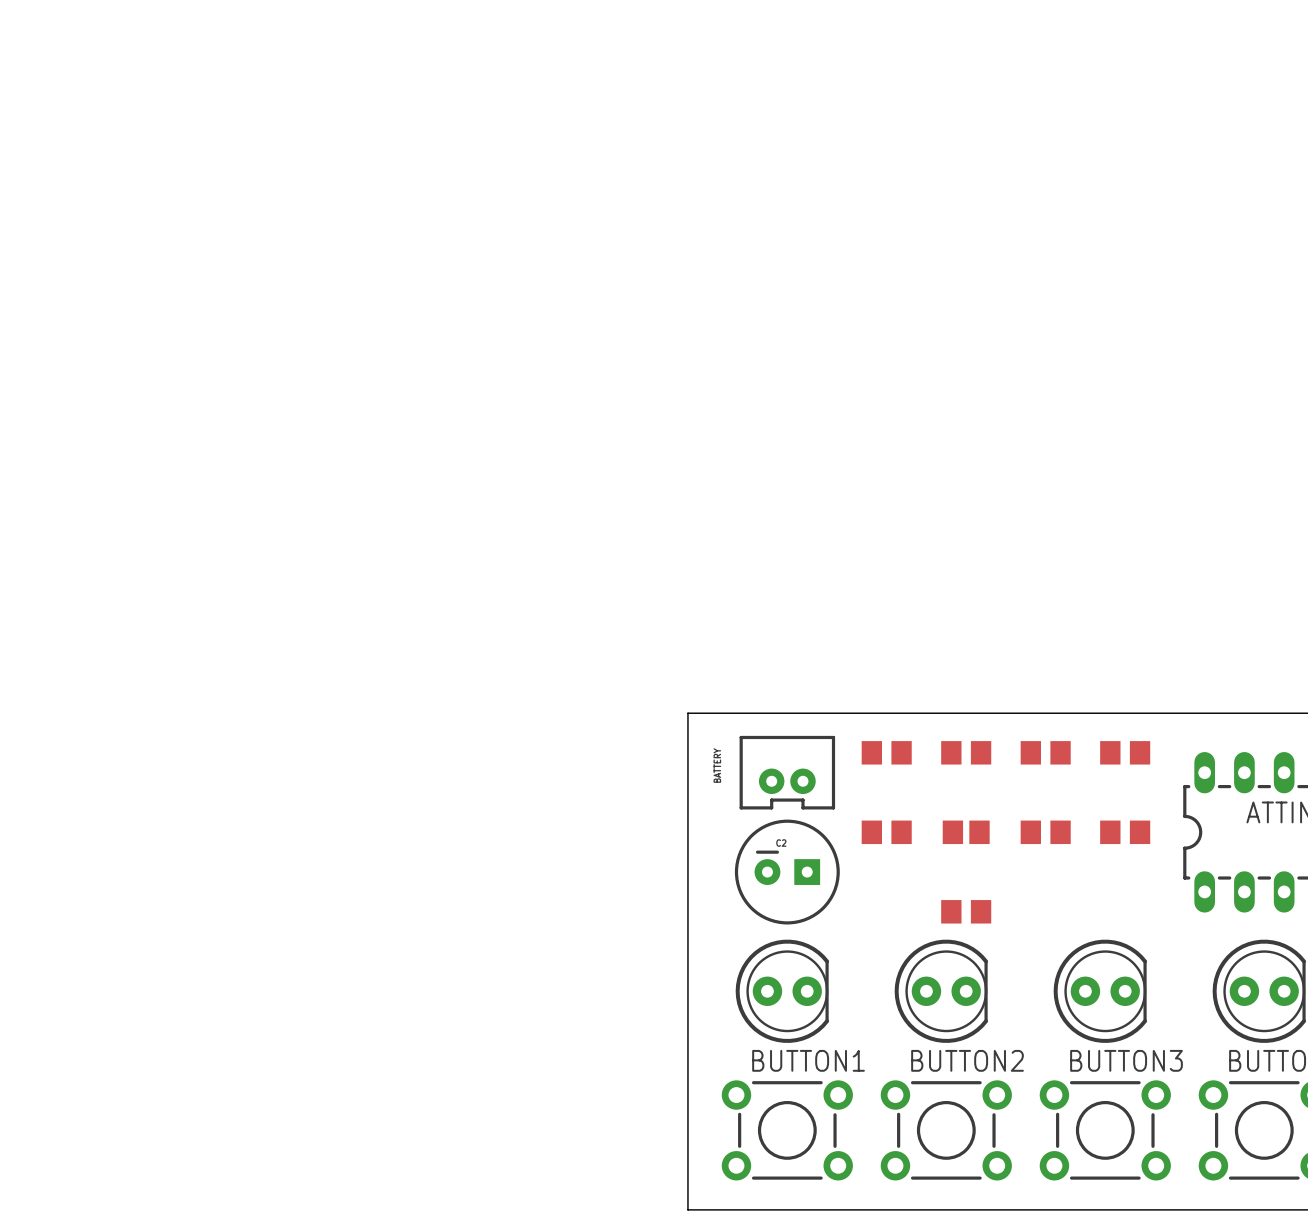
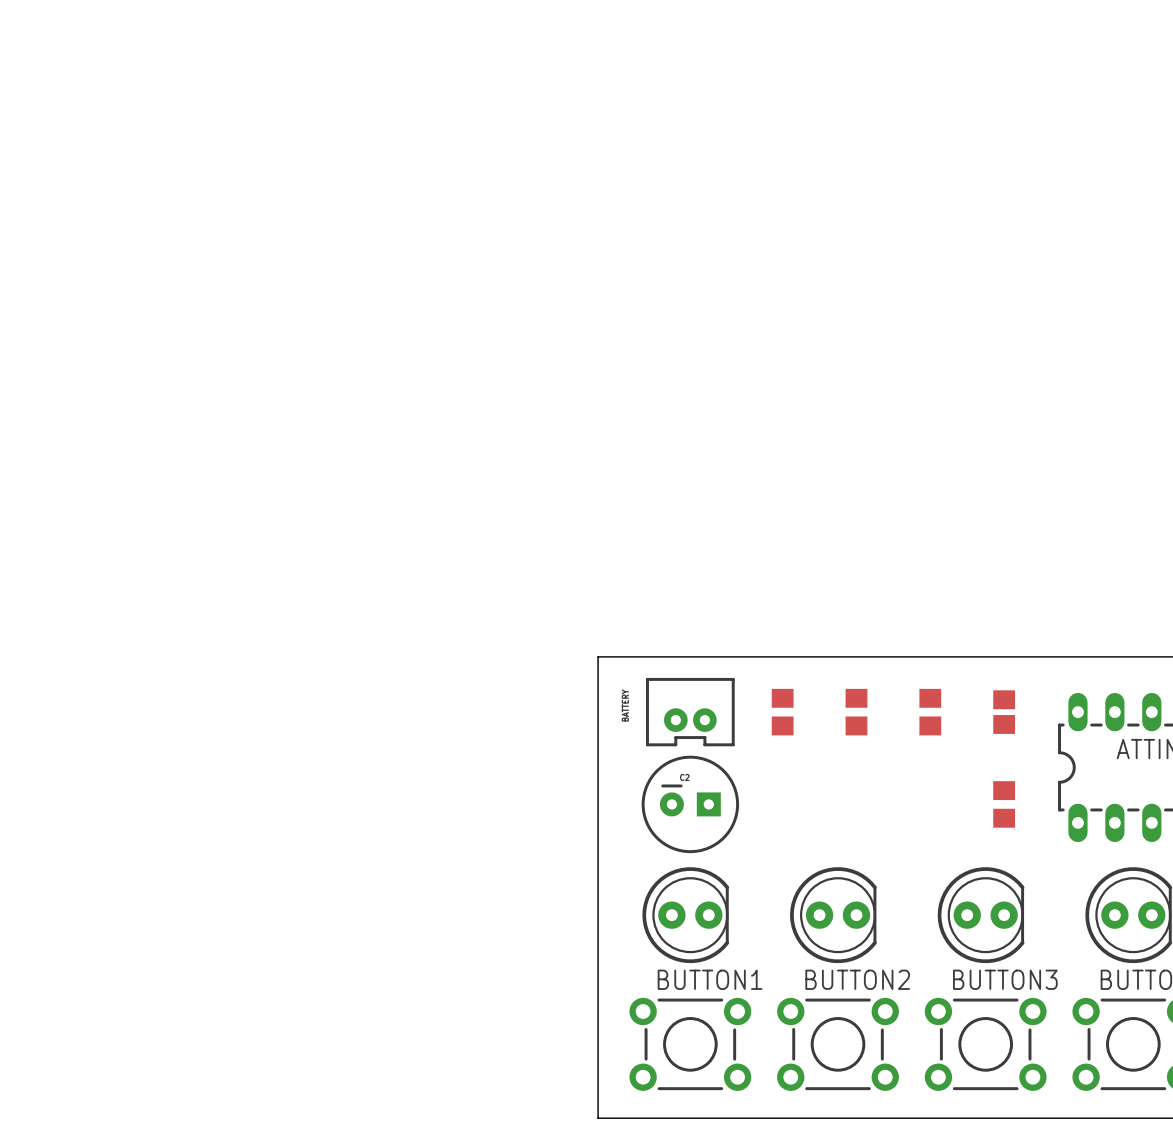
part rotation: 0° (886, 752) -> 90° clockwise (782, 712)
part rotation: 0° (966, 752) -> 90° clockwise (856, 712)
part rotation: 0° (1045, 752) -> 90° clockwise (930, 712)
part: (1125, 752) -> none
part: (886, 832) -> none
part rotation: 0° (966, 832) -> 90° clockwise (1004, 712)
part position: (966, 832) -> (1004, 712)
part: (1045, 832) -> none
part rotation: 0° (1125, 832) -> 90° clockwise (1004, 804)
part position: (1125, 832) -> (1004, 804)
part: (966, 911) -> none

